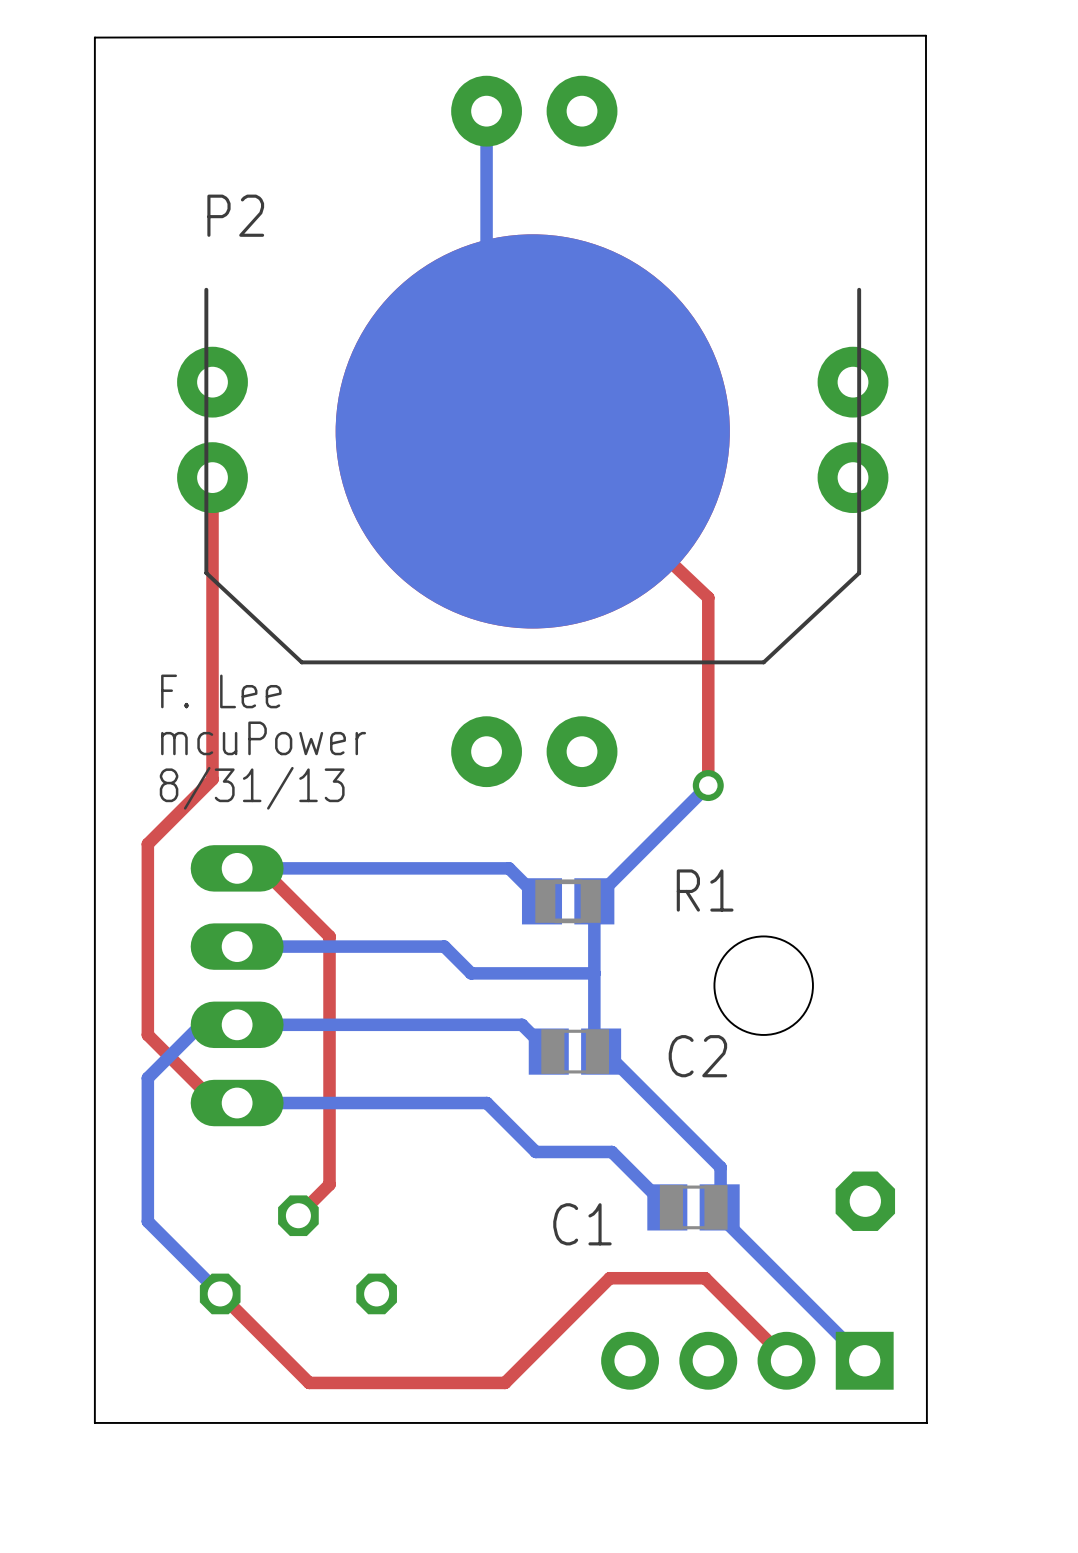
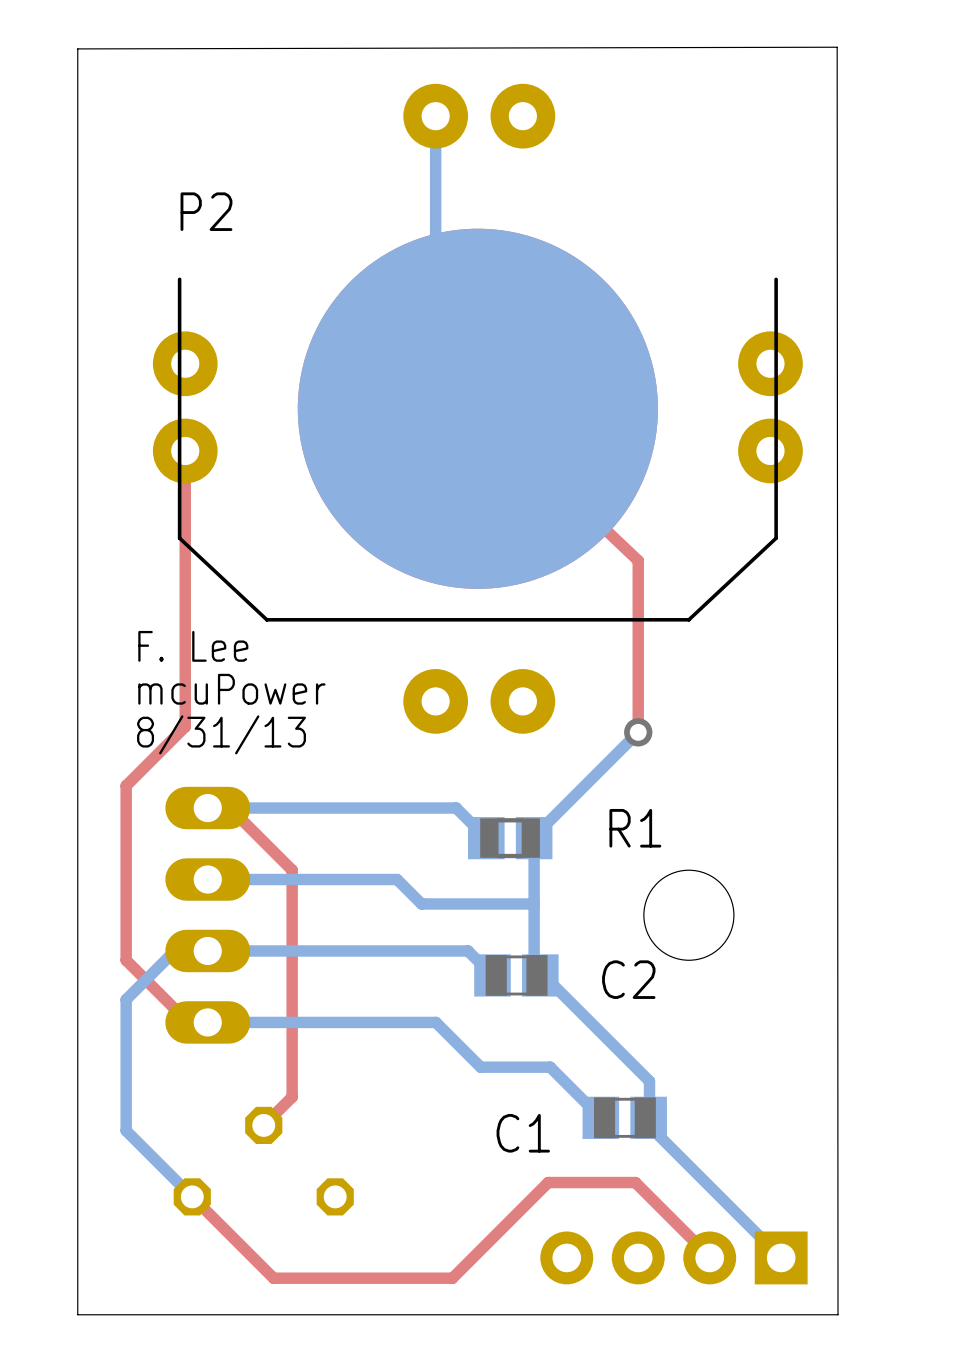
part: (865, 1201) -> none

